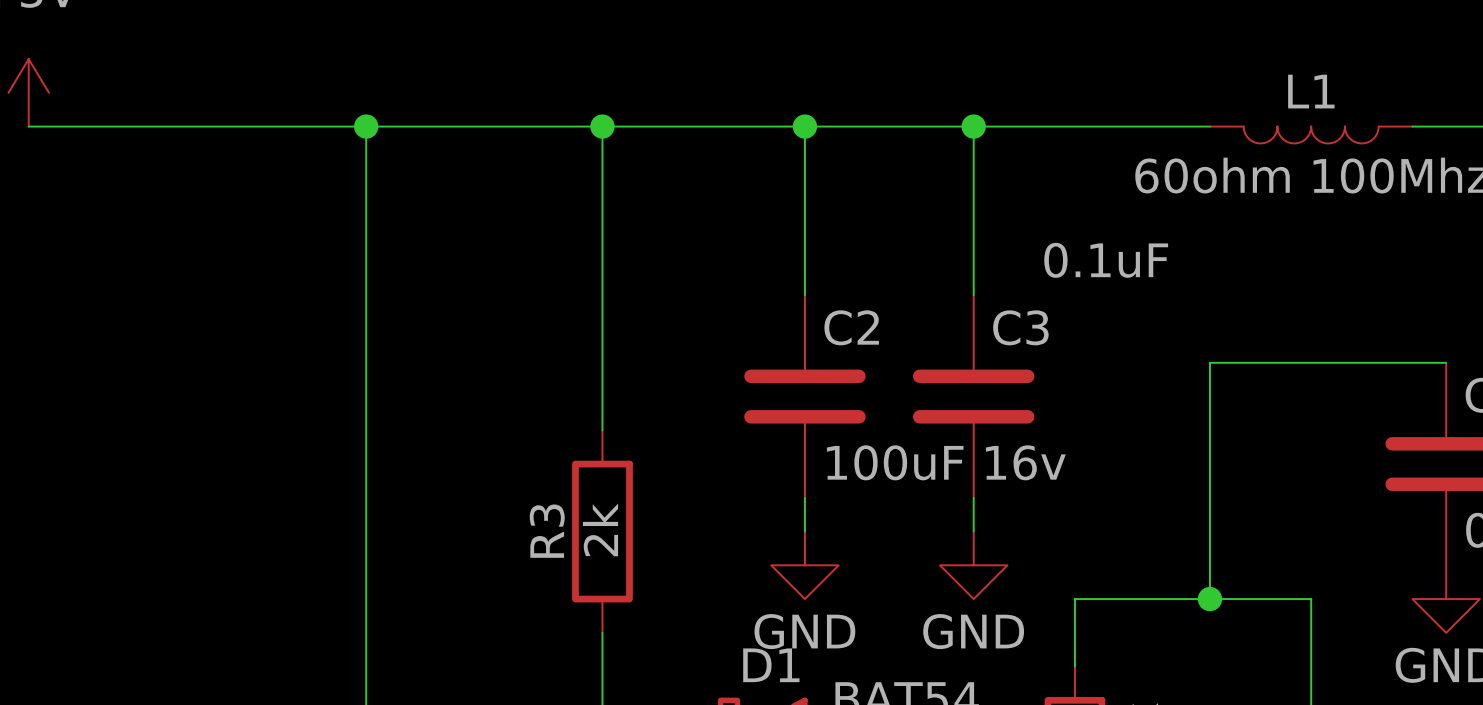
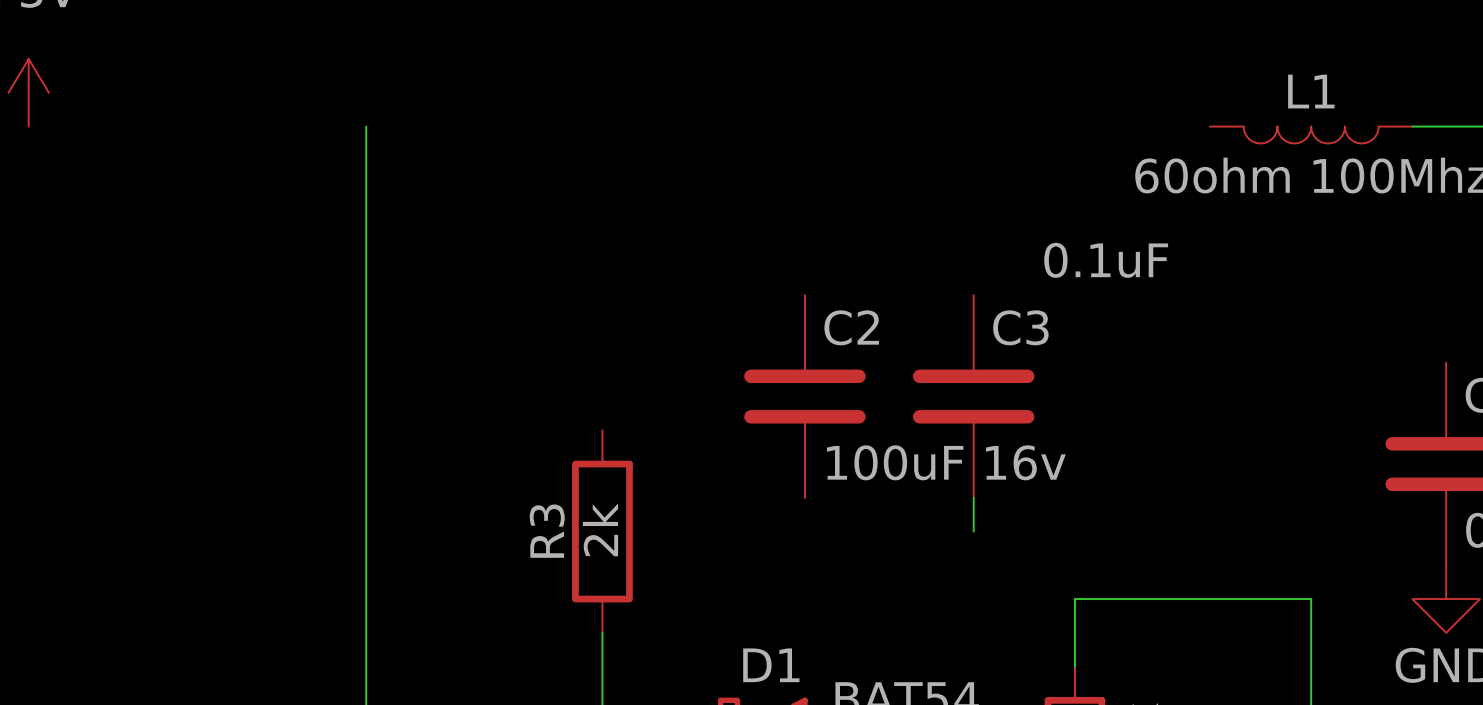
wire: (28, 126) (1209, 126) -> none
junction: (366, 126) -> none
wire: (602, 126) (602, 430) -> none
junction: (602, 126) -> none
wire: (804, 126) (804, 295) -> none
junction: (804, 126) -> none
wire: (973, 126) (973, 295) -> none
junction: (973, 126) -> none
wire: (1446, 362) (1209, 362) (1209, 599) -> none
wire: (804, 497) (804, 531) -> none
power symbol: GND (804, 565) -> none
power symbol: GND (973, 565) -> none
junction: (1209, 599) -> none

